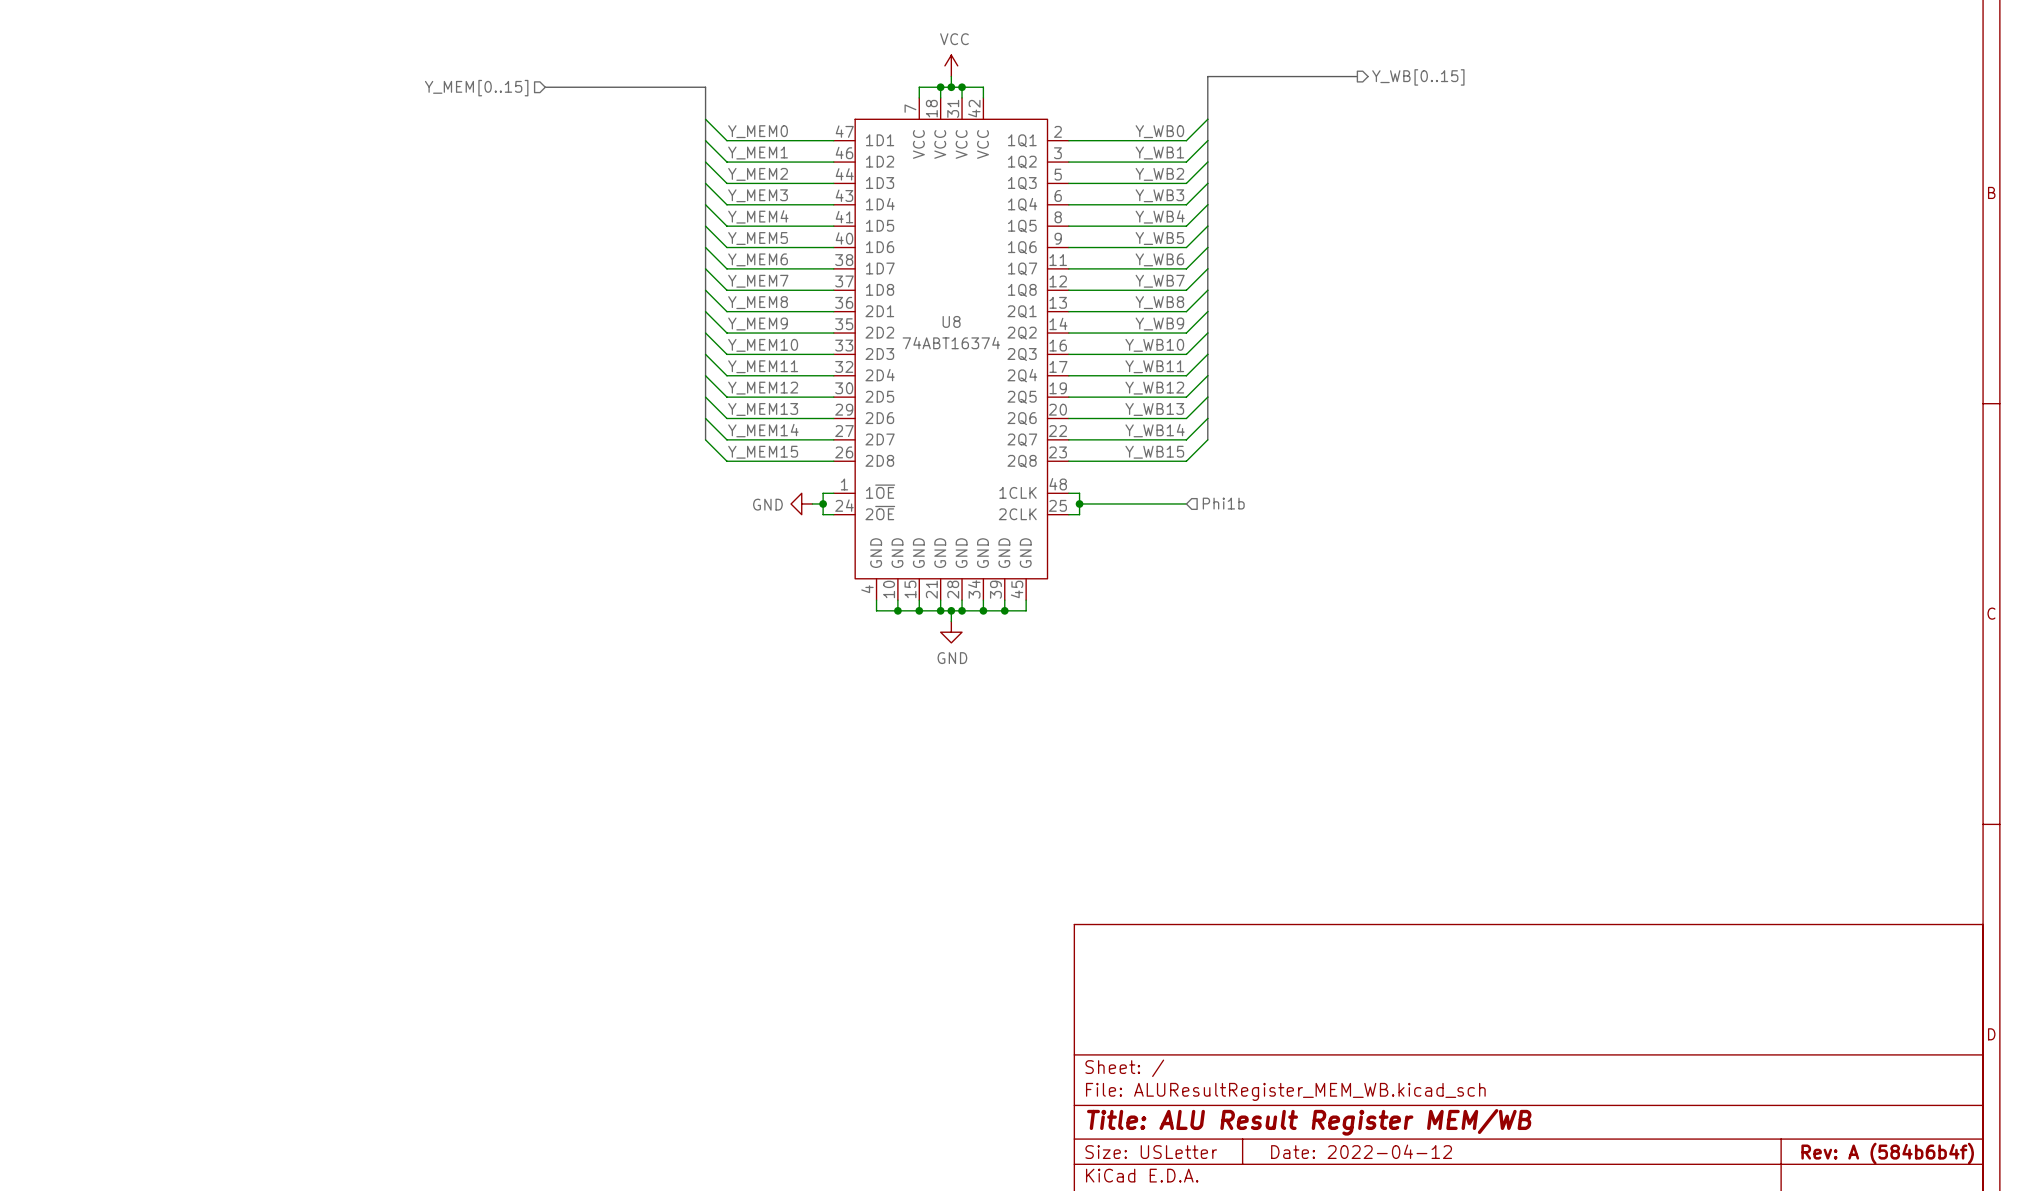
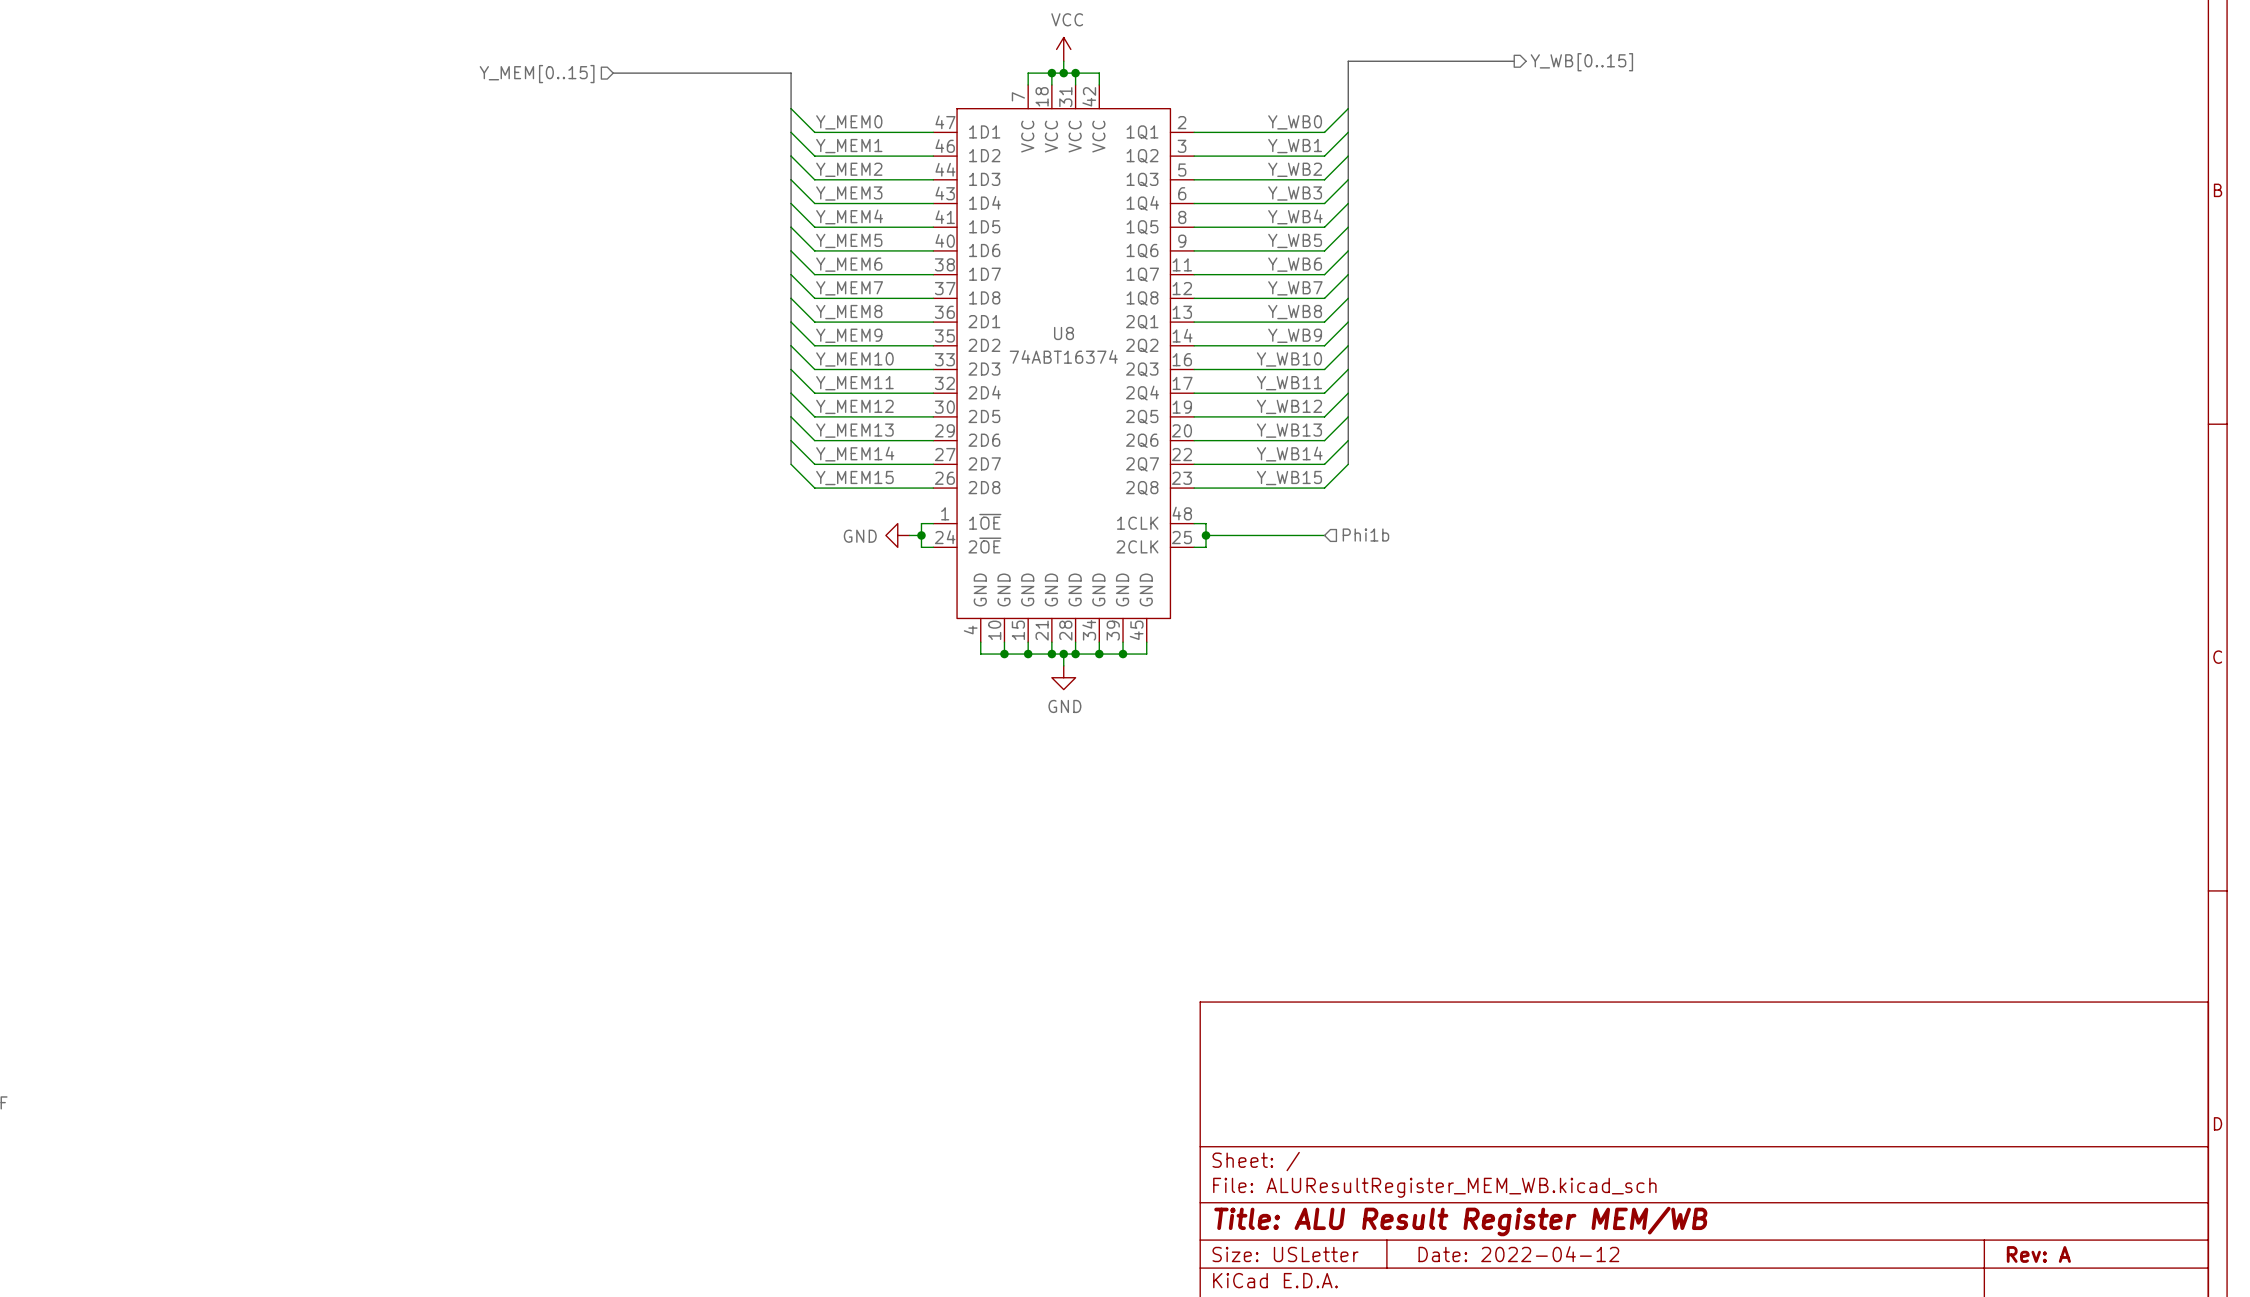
title block: Rev: A (584b6b4f) (1887, 1153) -> Rev: A (2038, 1254)

